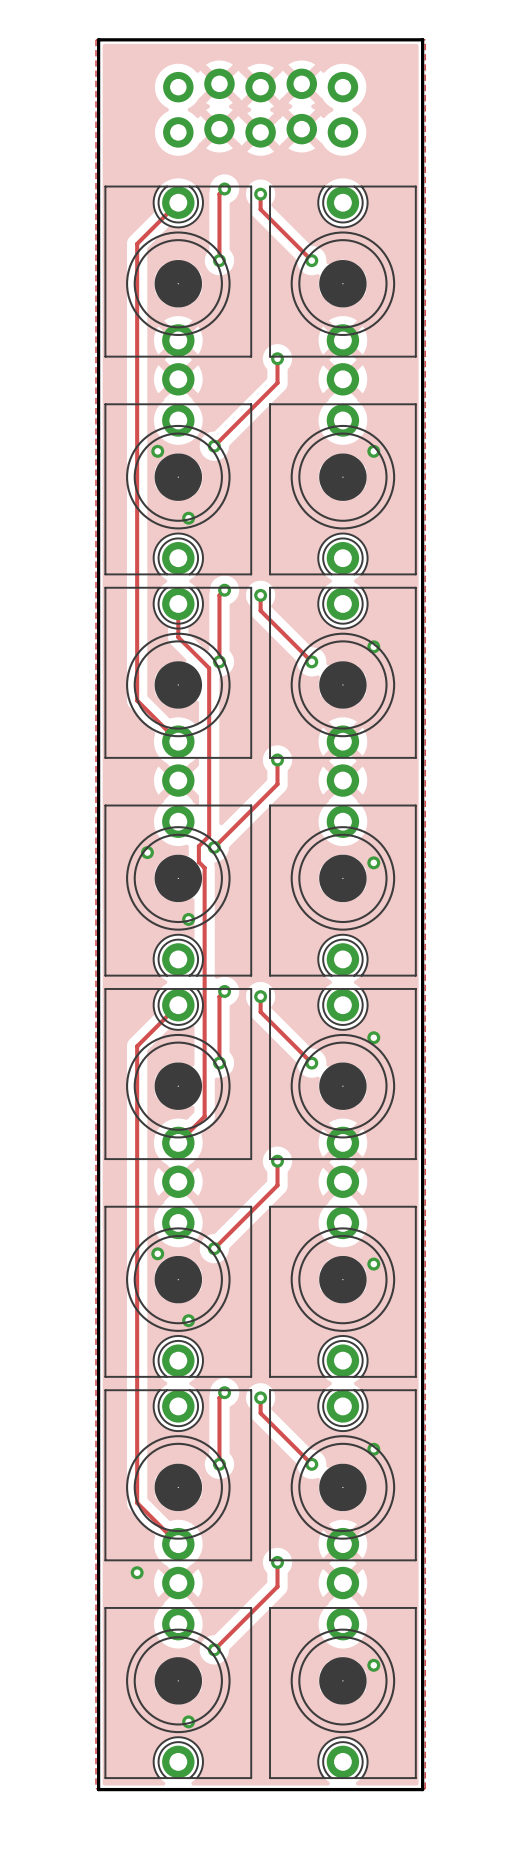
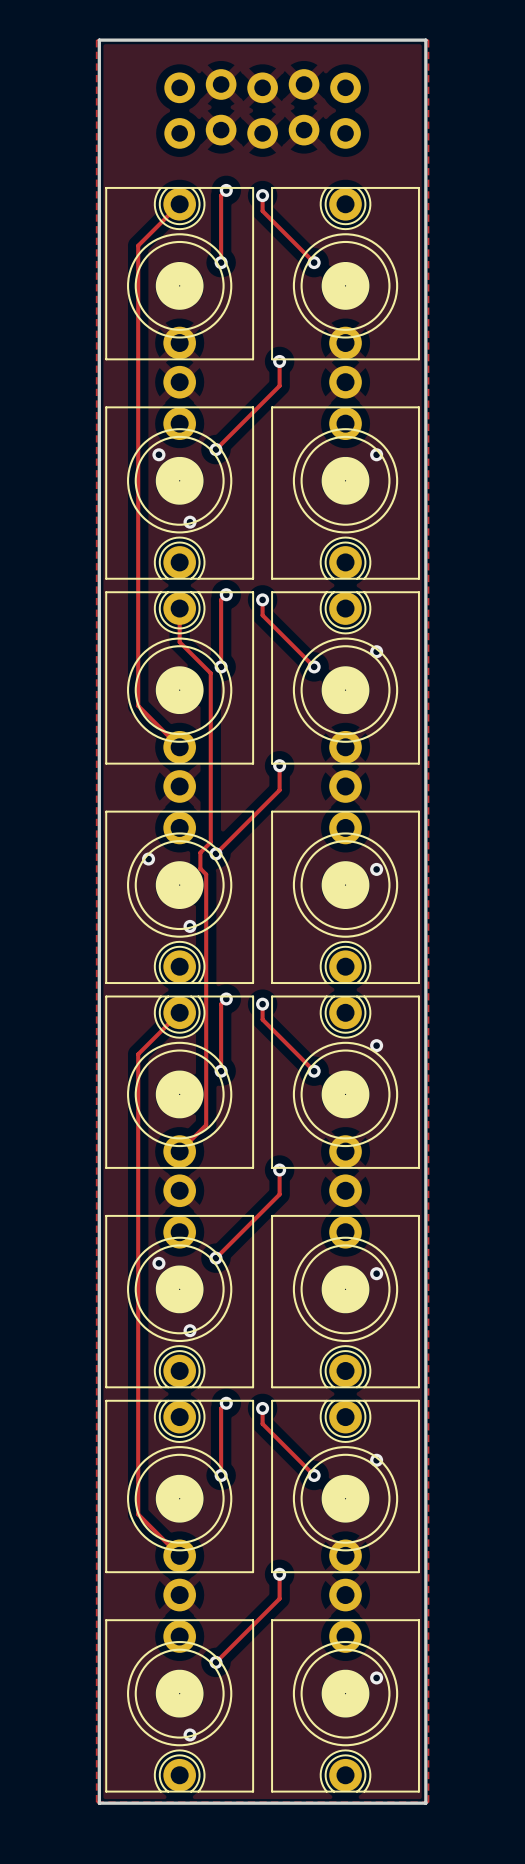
via: (137, 1572) -> none

